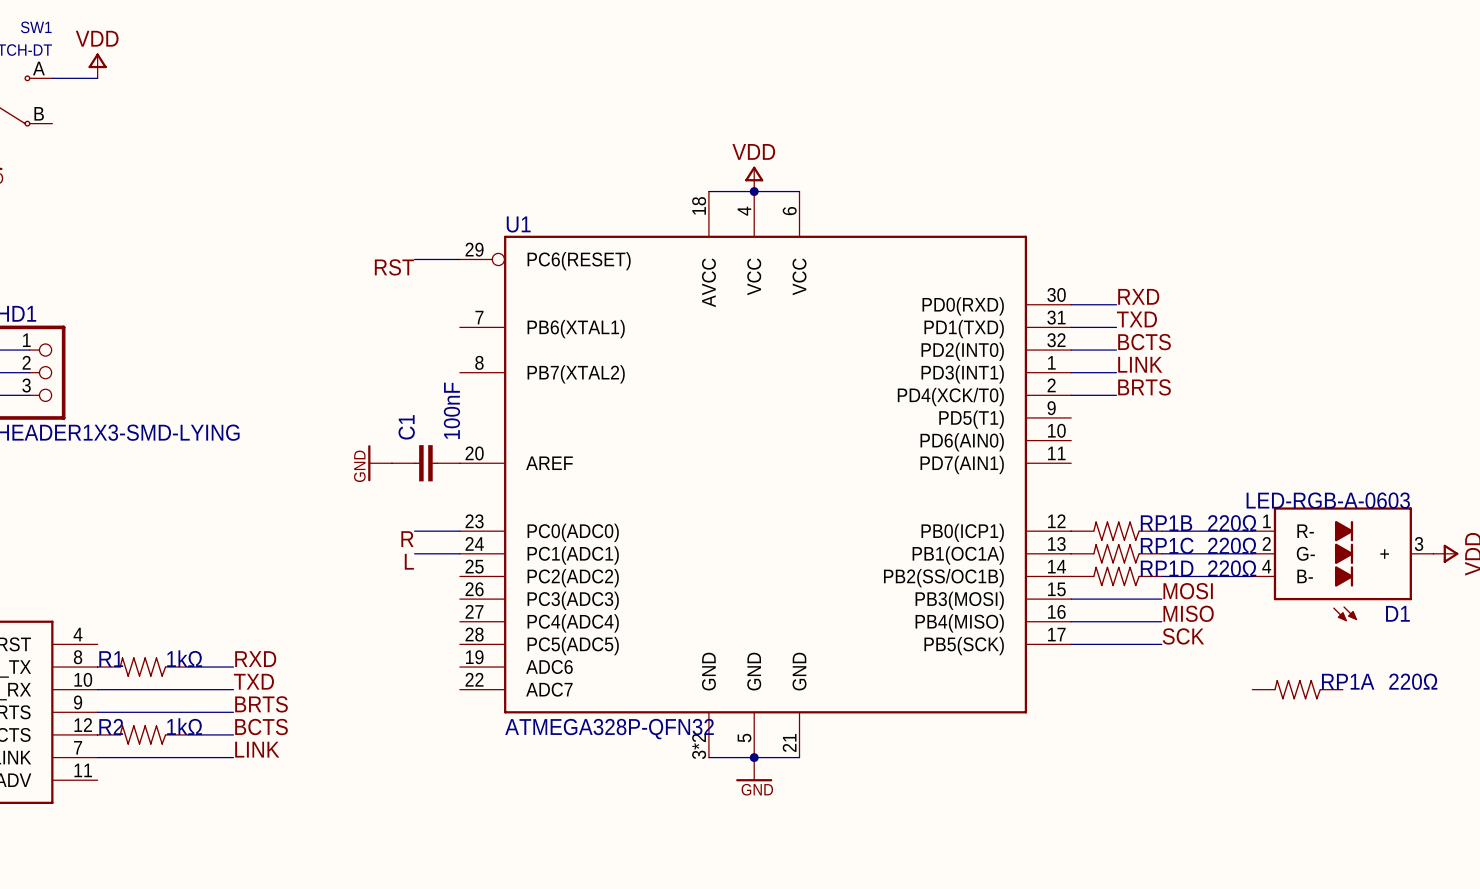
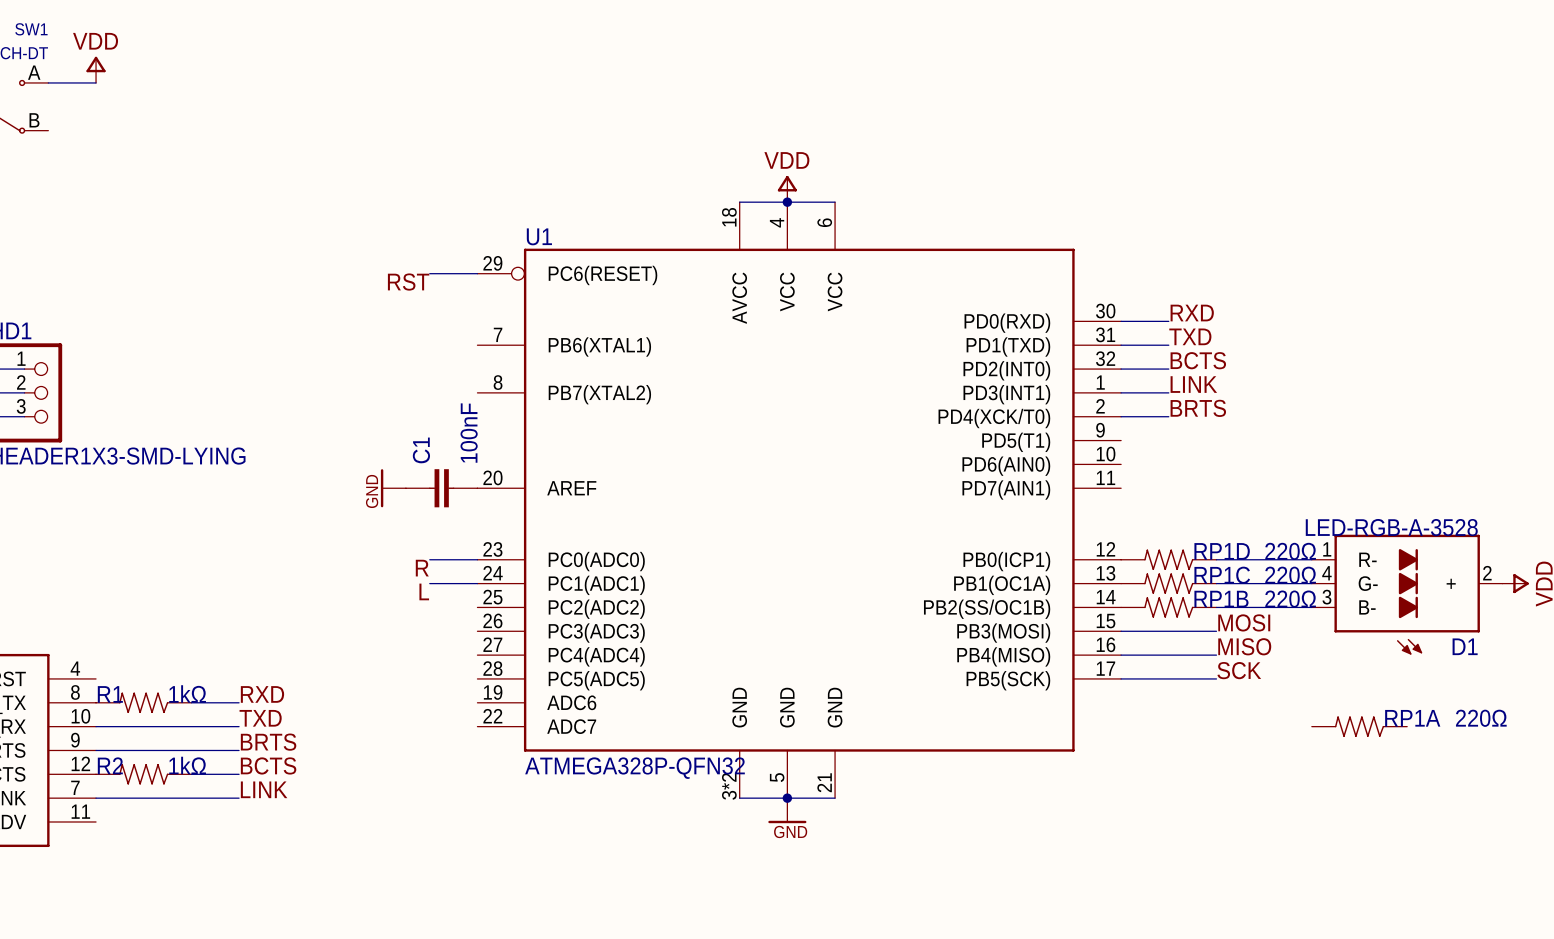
D1 value: LED-RGB-A-0603 (1328, 500) -> LED-RGB-A-3528 (1391, 527)
RP1B name: RP1B (1166, 523) -> RP1D (1222, 551)
D1 pin number: 2 (1266, 543) -> 4 (1326, 573)
D1 pin number: 3 (1419, 544) -> 2 (1487, 573)
D1 pin number: 4 (1266, 566) -> 3 (1326, 597)
RP1D name: RP1D (1167, 568) -> RP1B (1221, 599)

